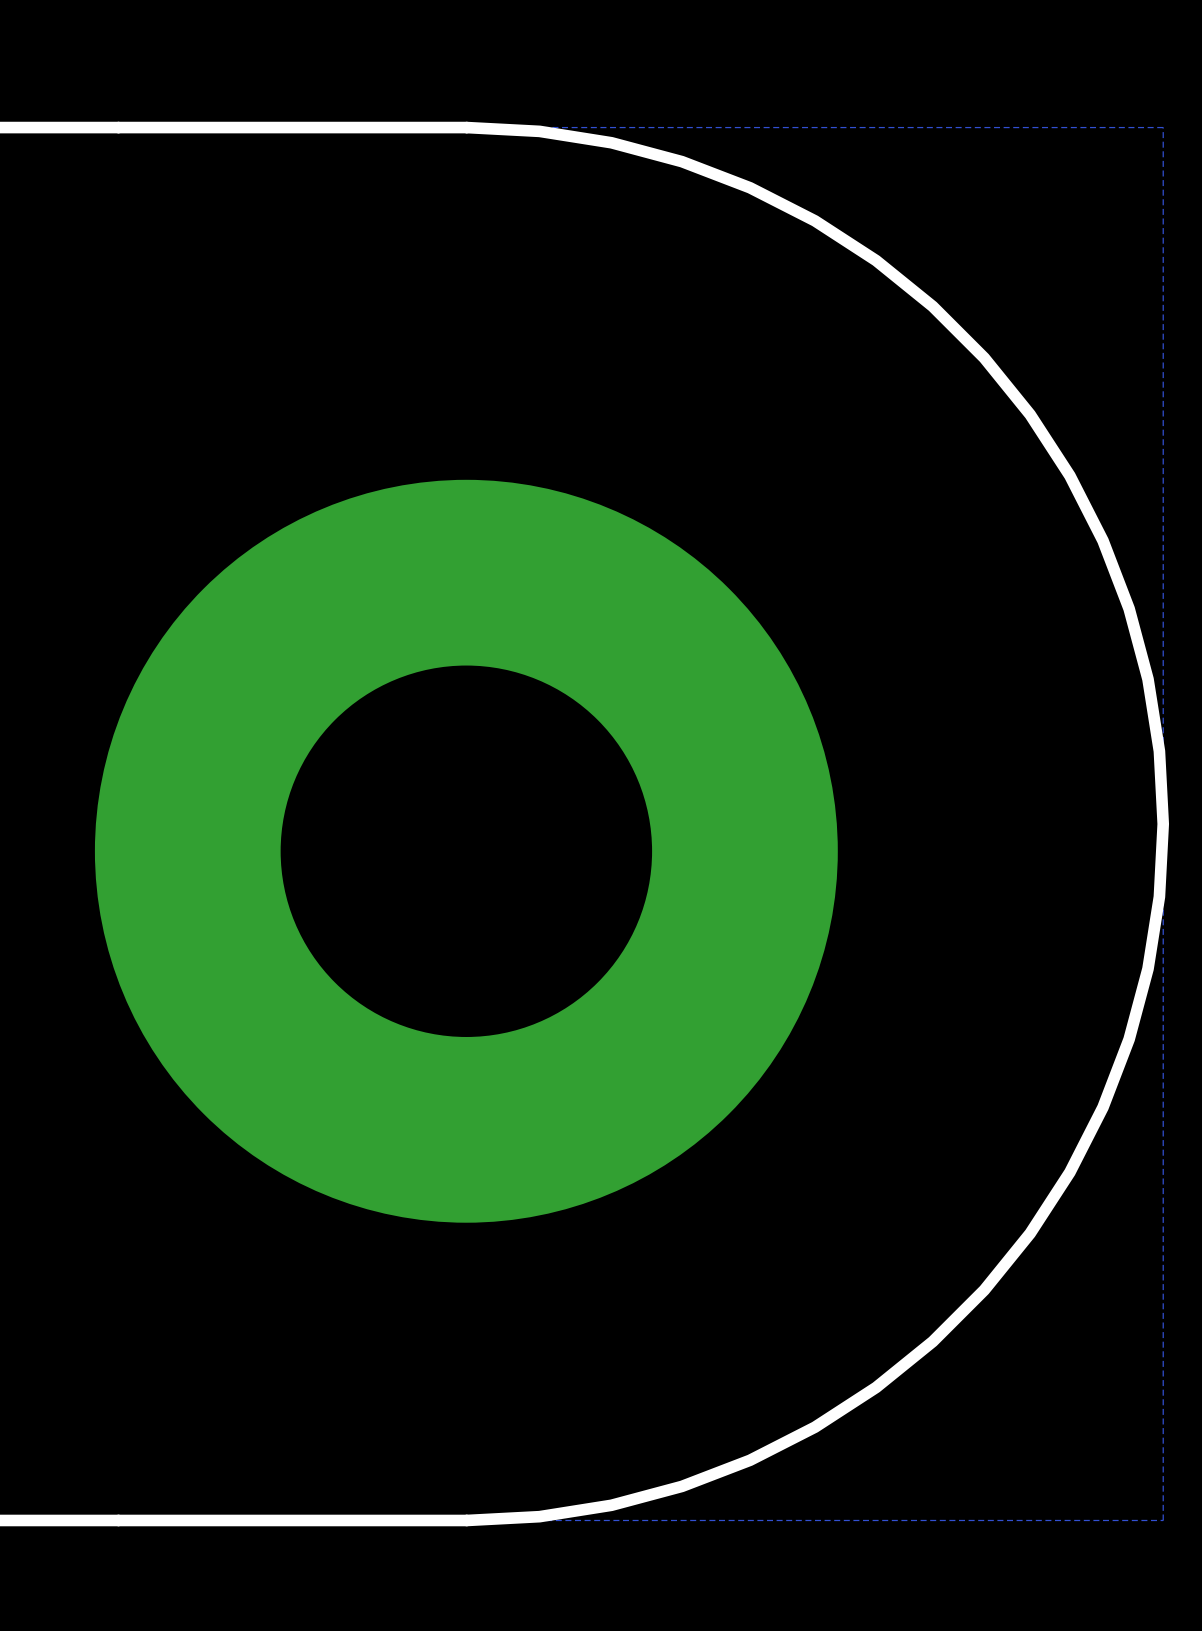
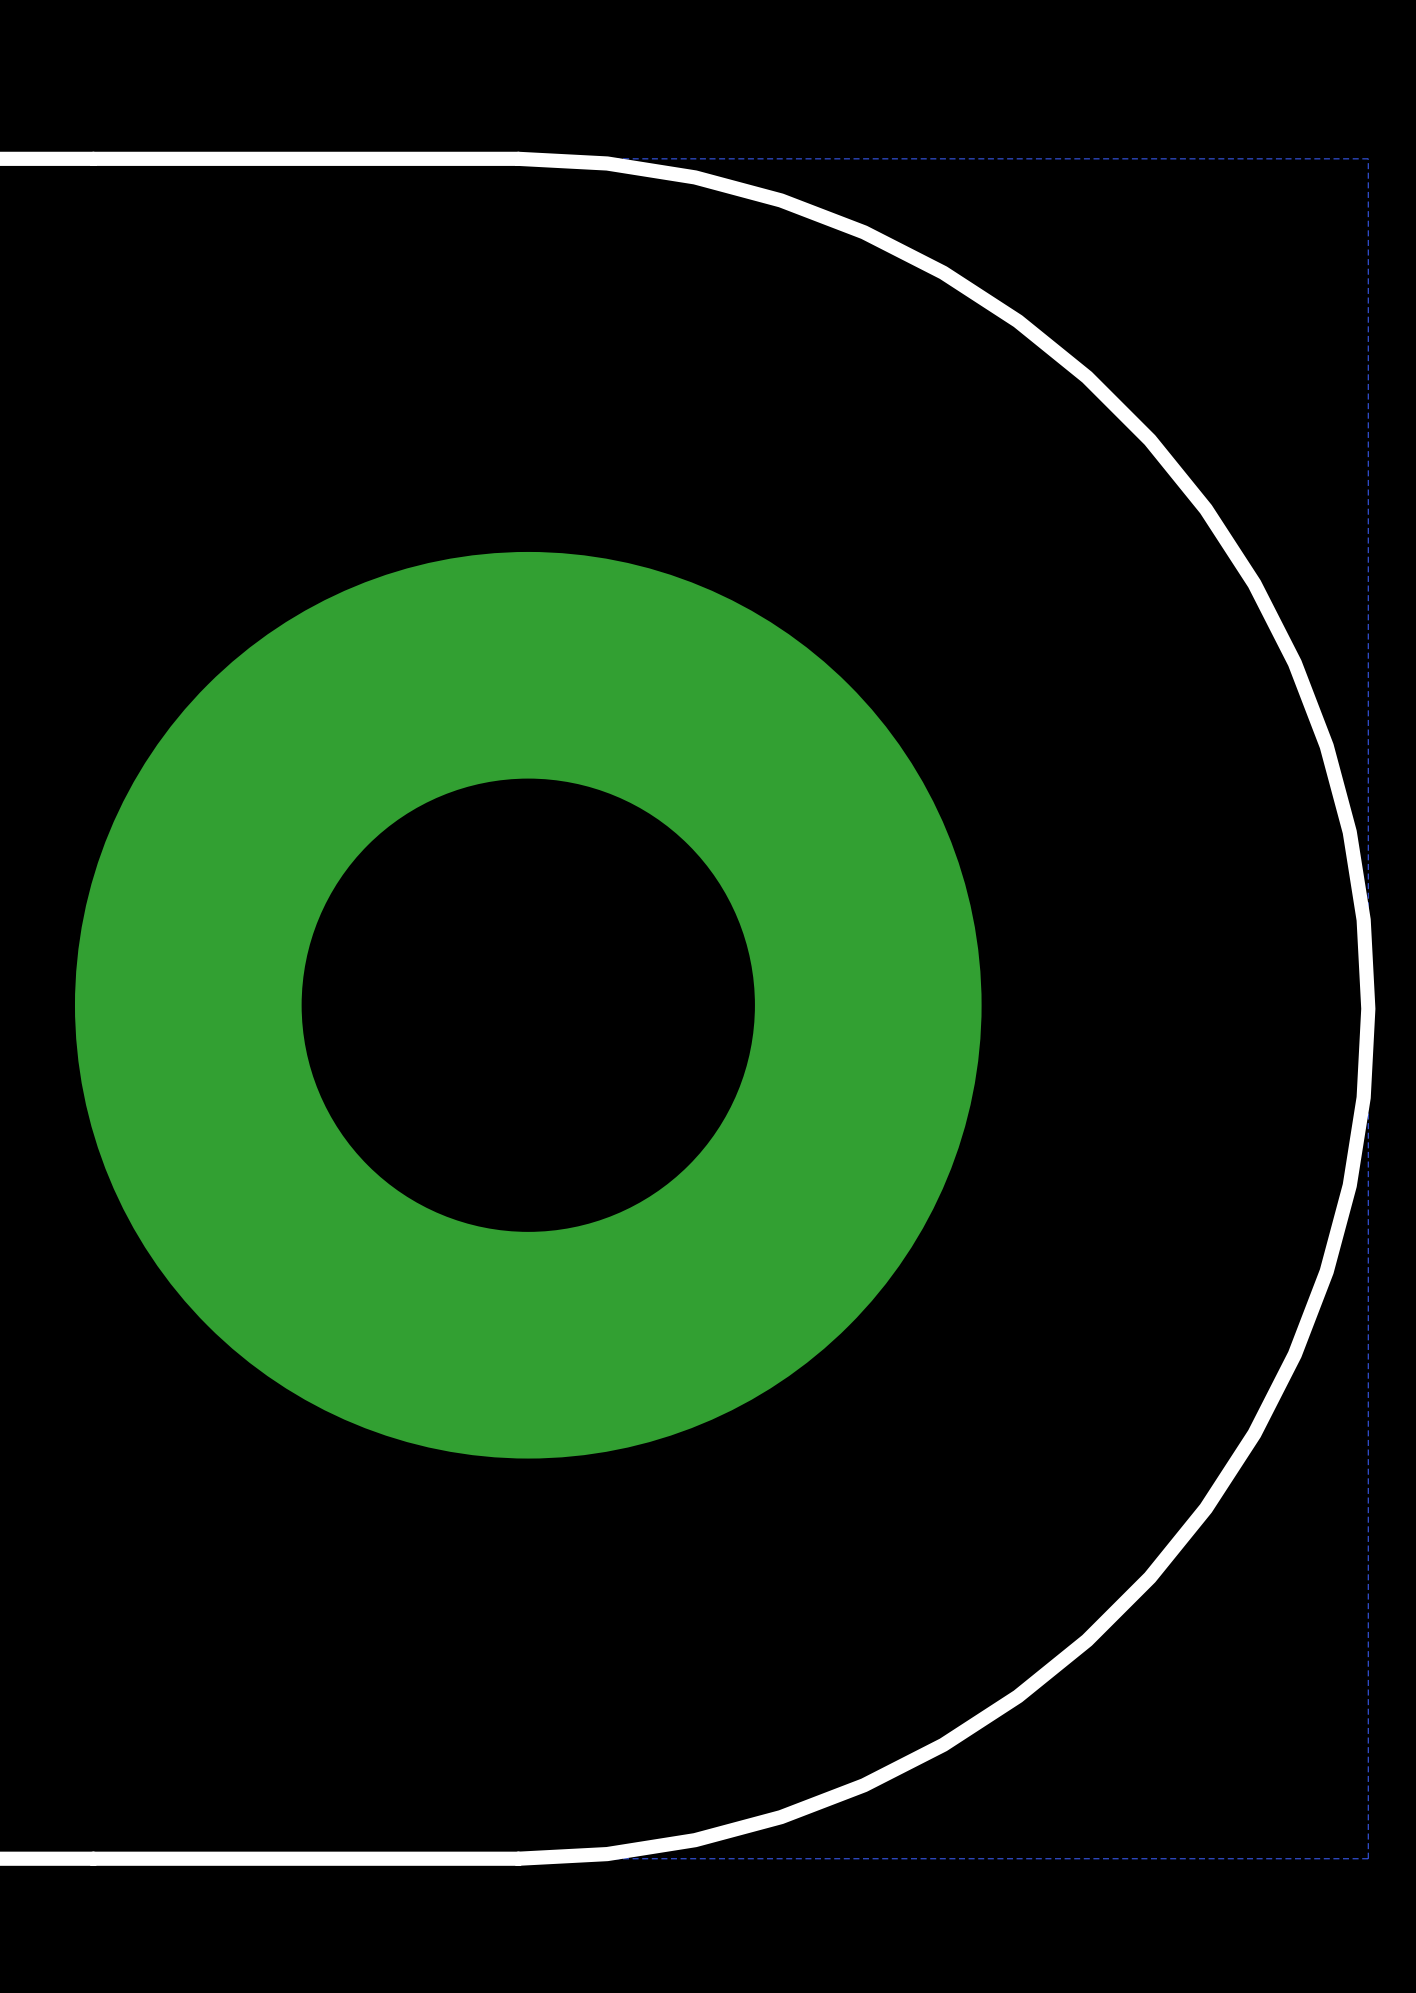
part position: (466, 851) -> (528, 1005)

